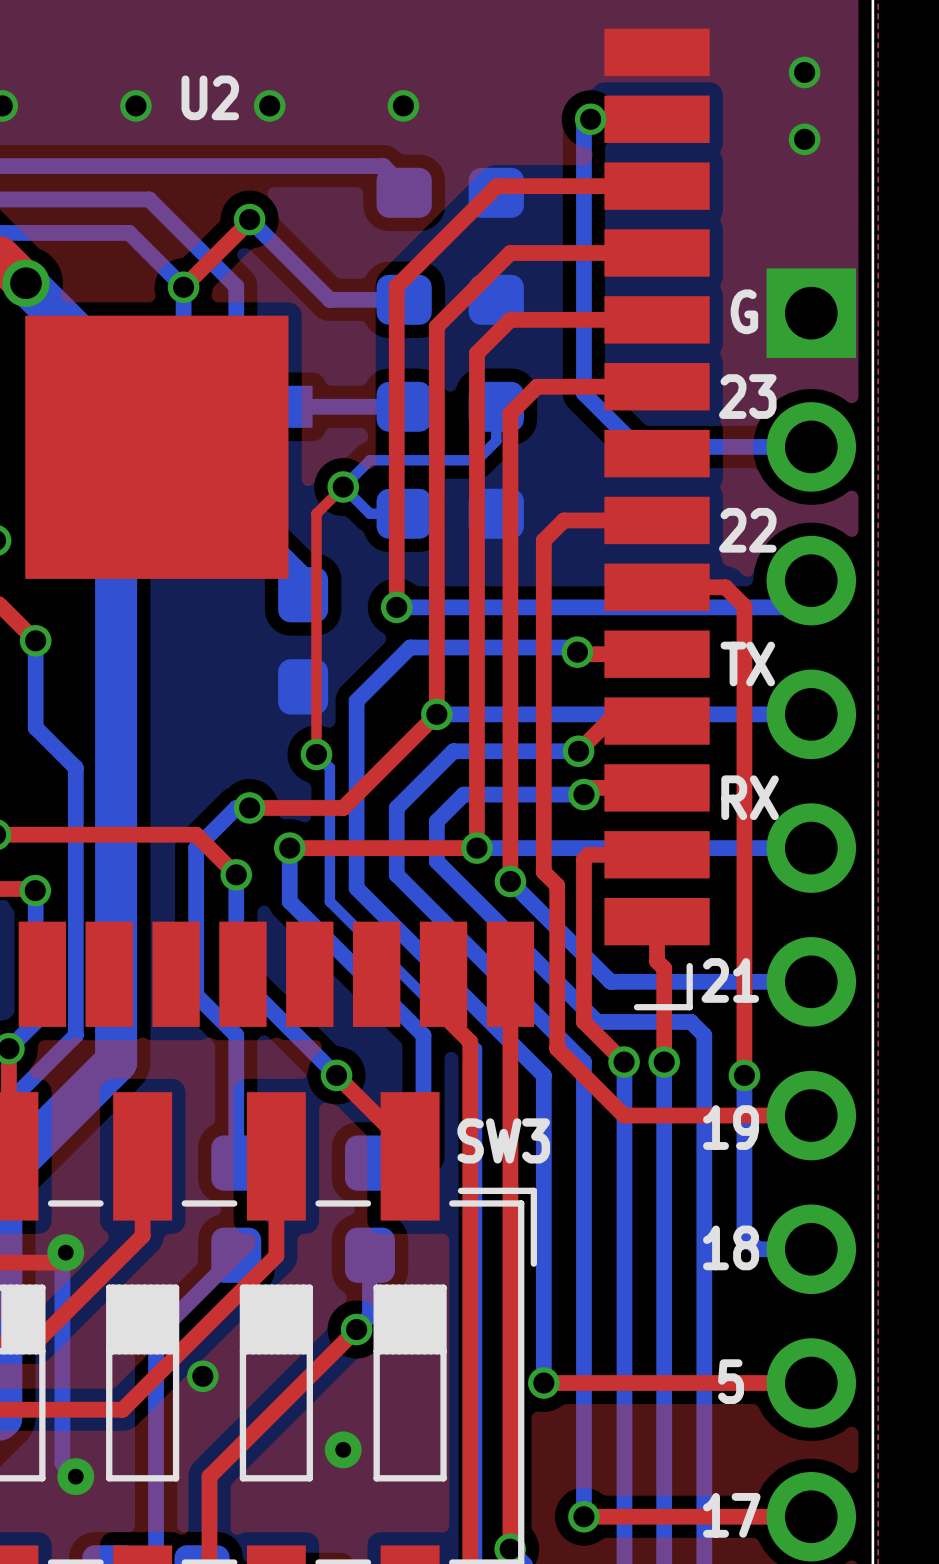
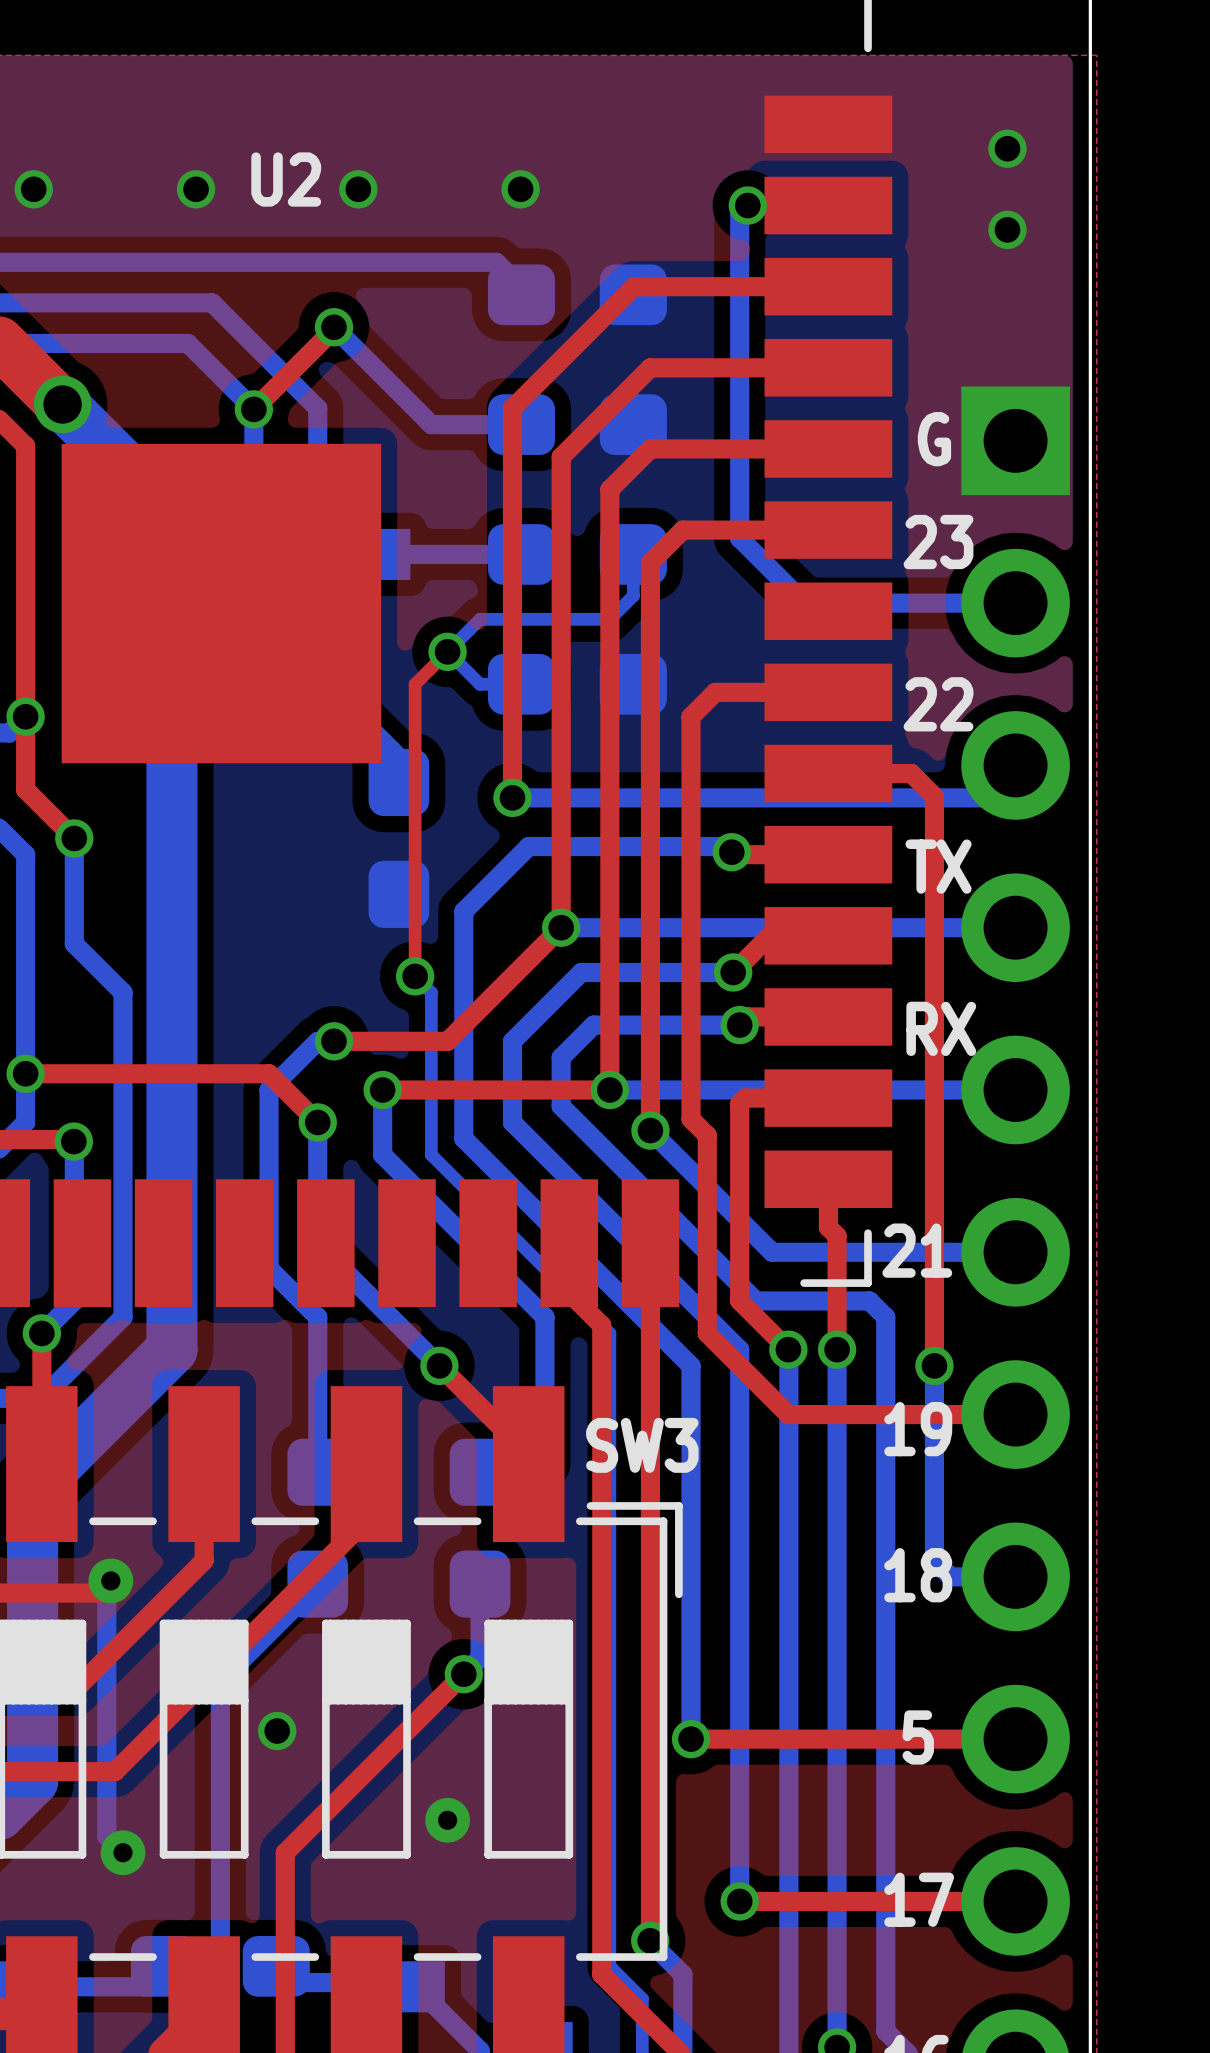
top track: (276, 1202) (276, 1255) (122, 1409) (69, 1409) -> (366, 1520) (114, 1771)

